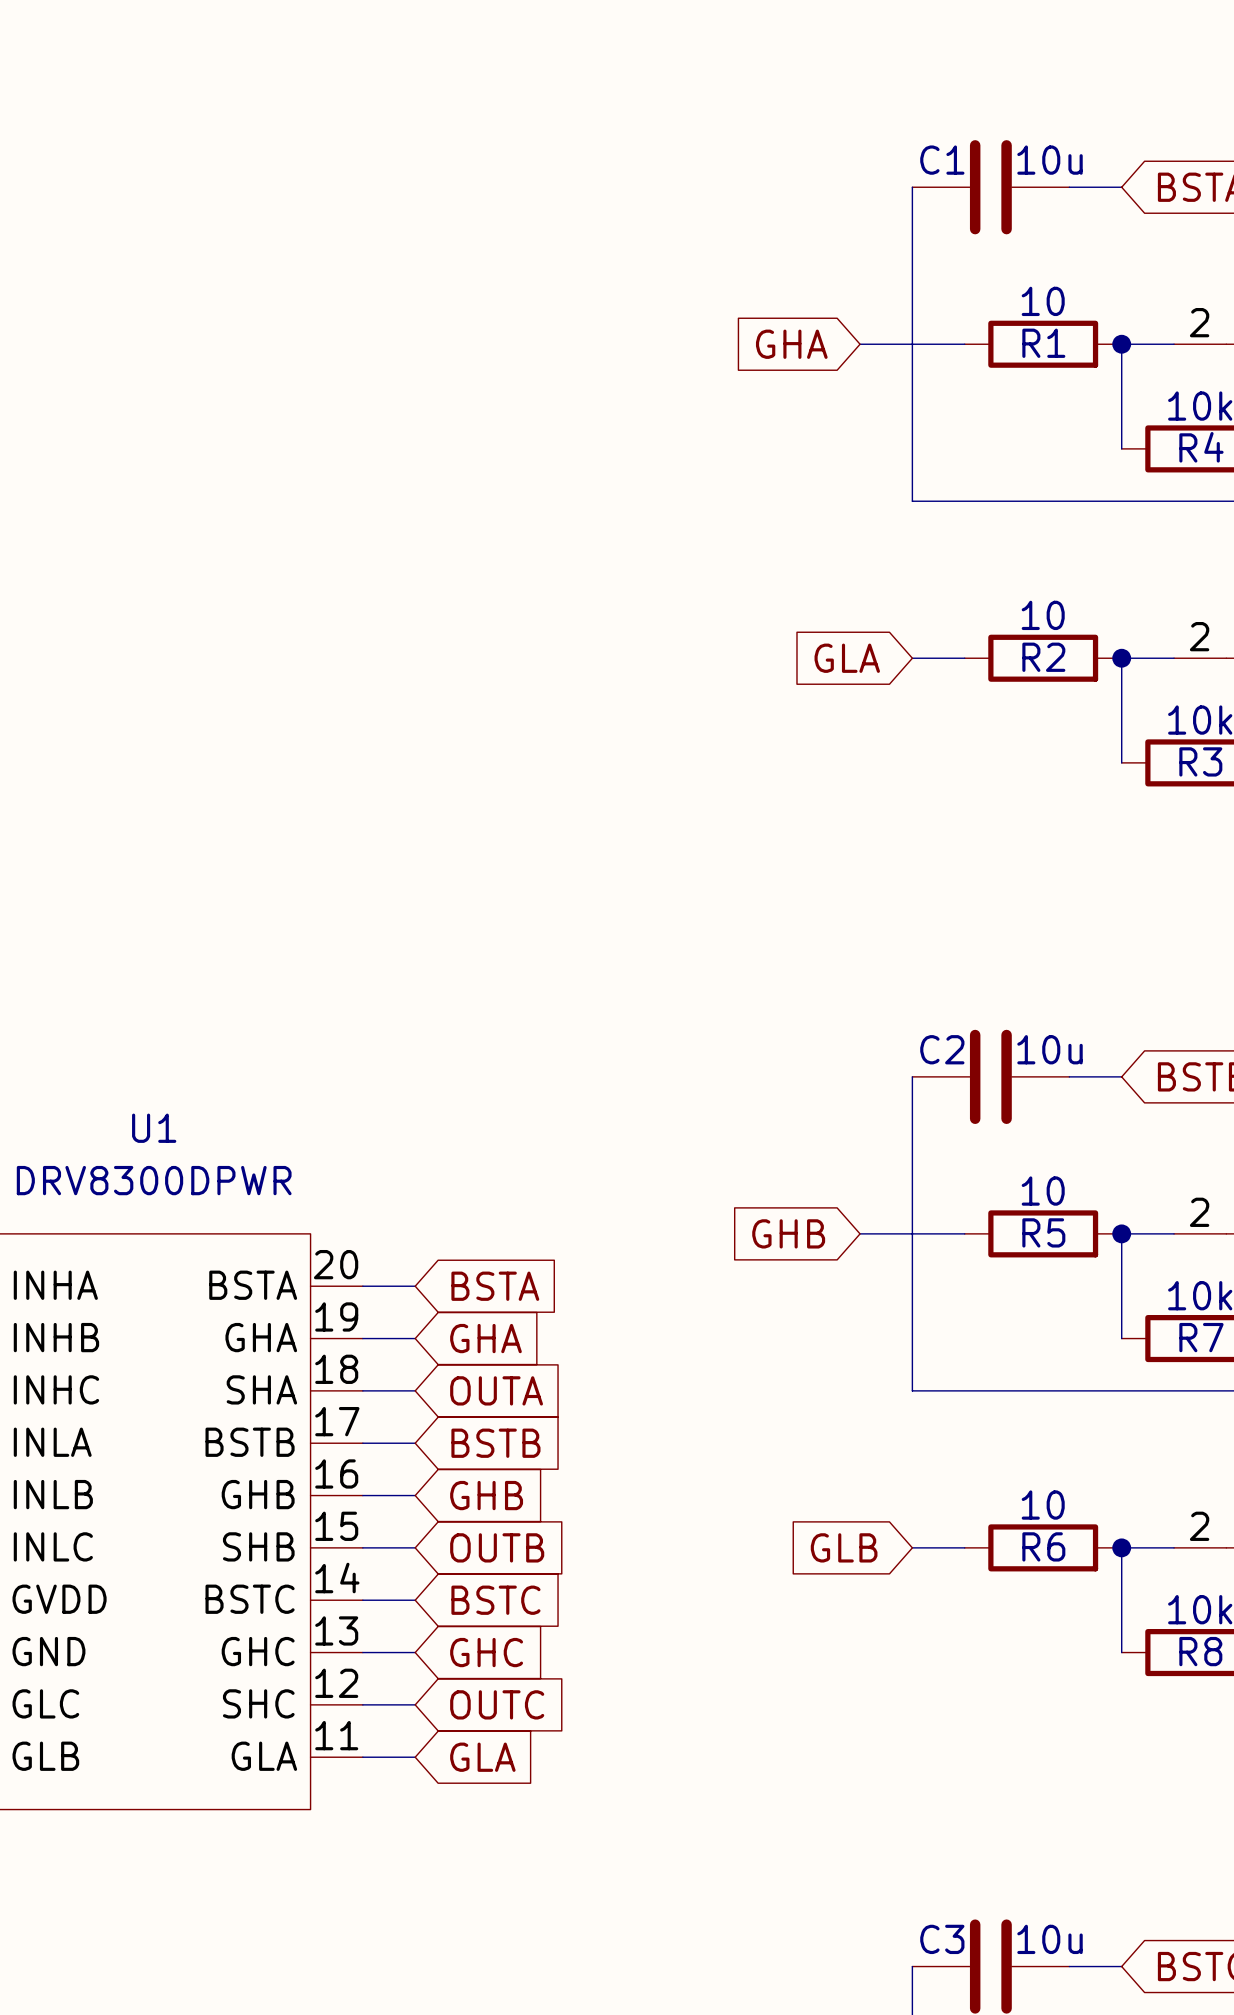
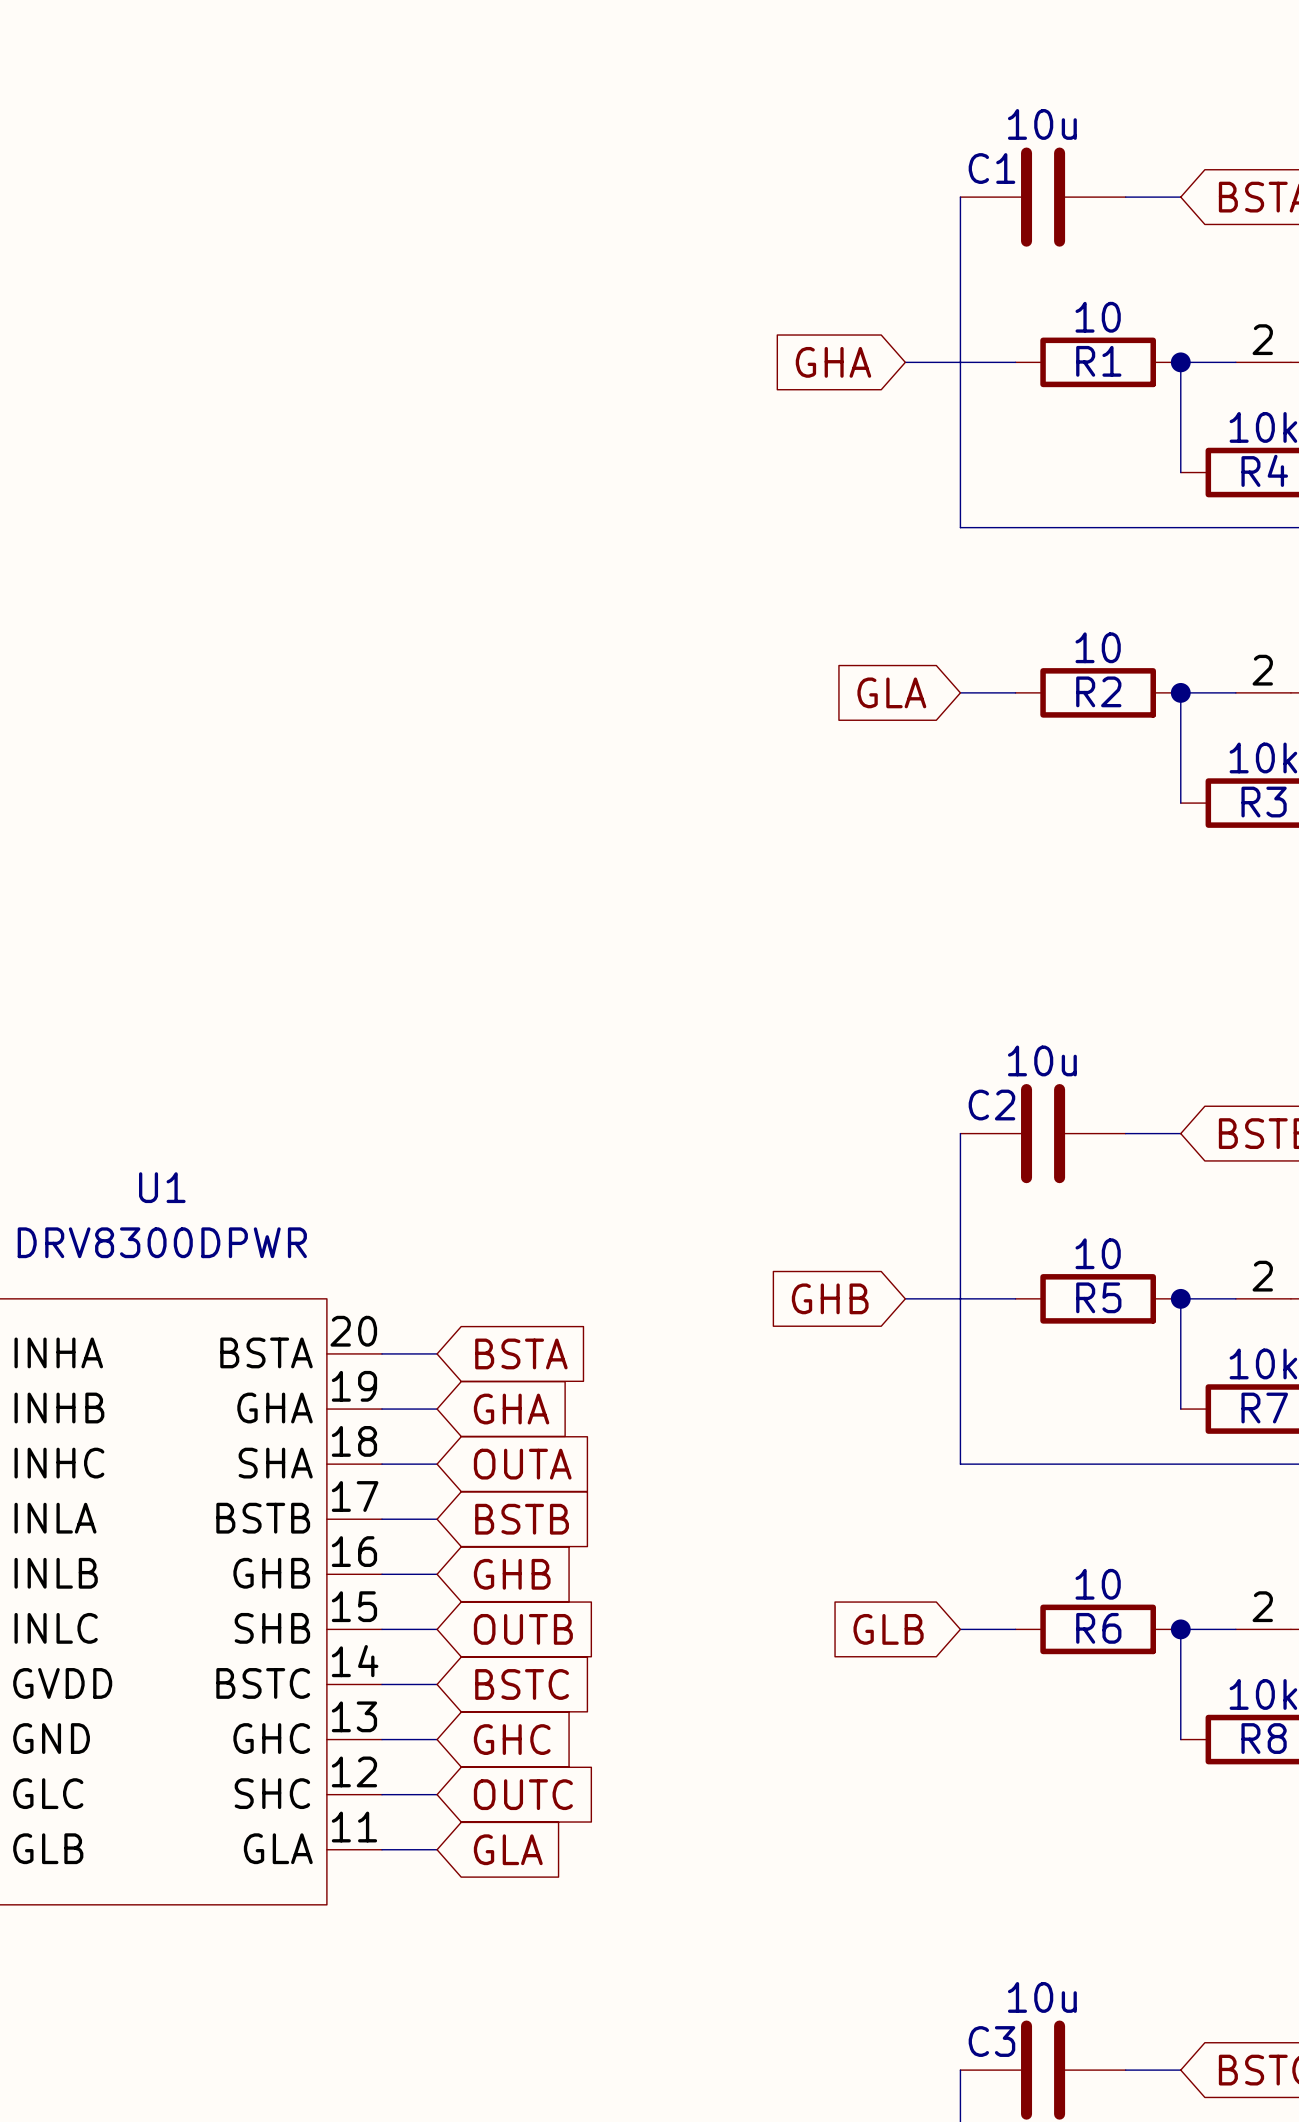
C1 value position: 10u (1050, 160) -> 10u (1042, 124)
C2 value position: 10u (1050, 1049) -> 10u (1042, 1060)
C3 value position: 10u (1050, 1939) -> 10u (1042, 1997)

